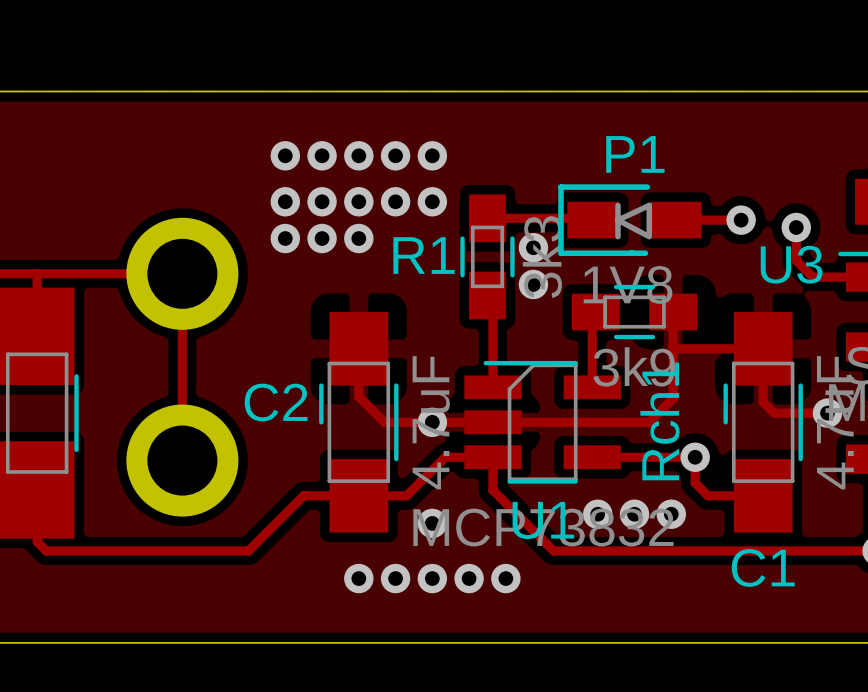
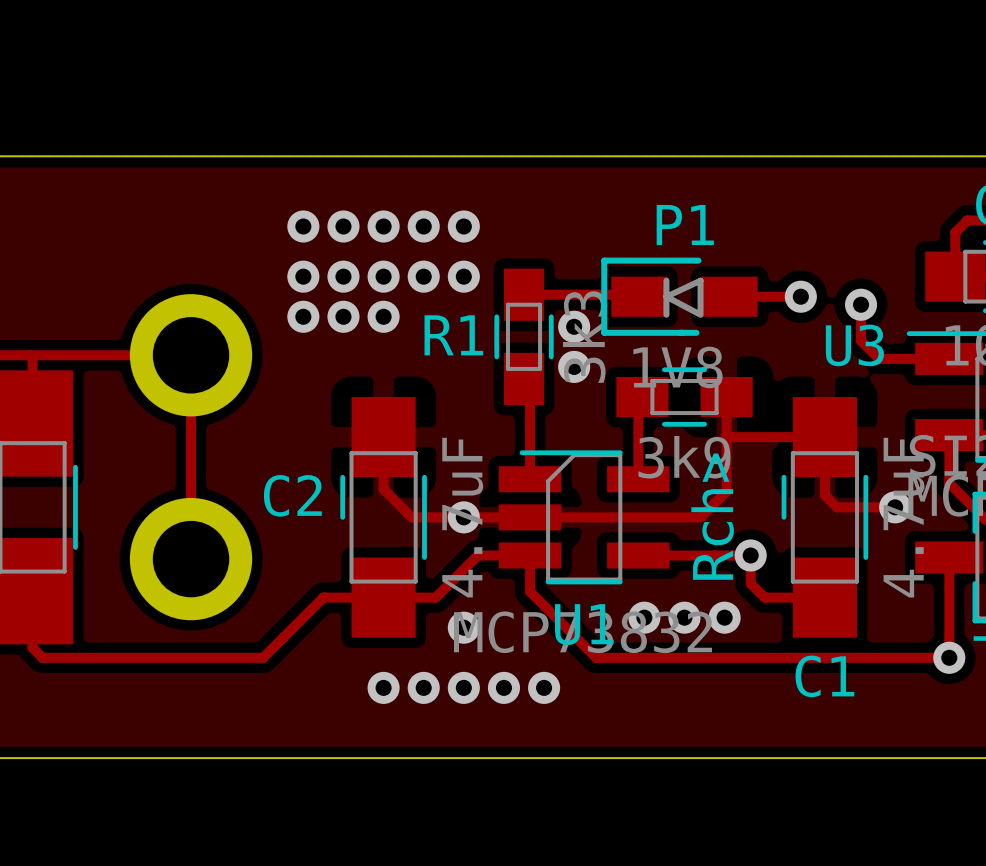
Rch1 name: Rch1 (660, 421) -> Rch> (712, 516)

